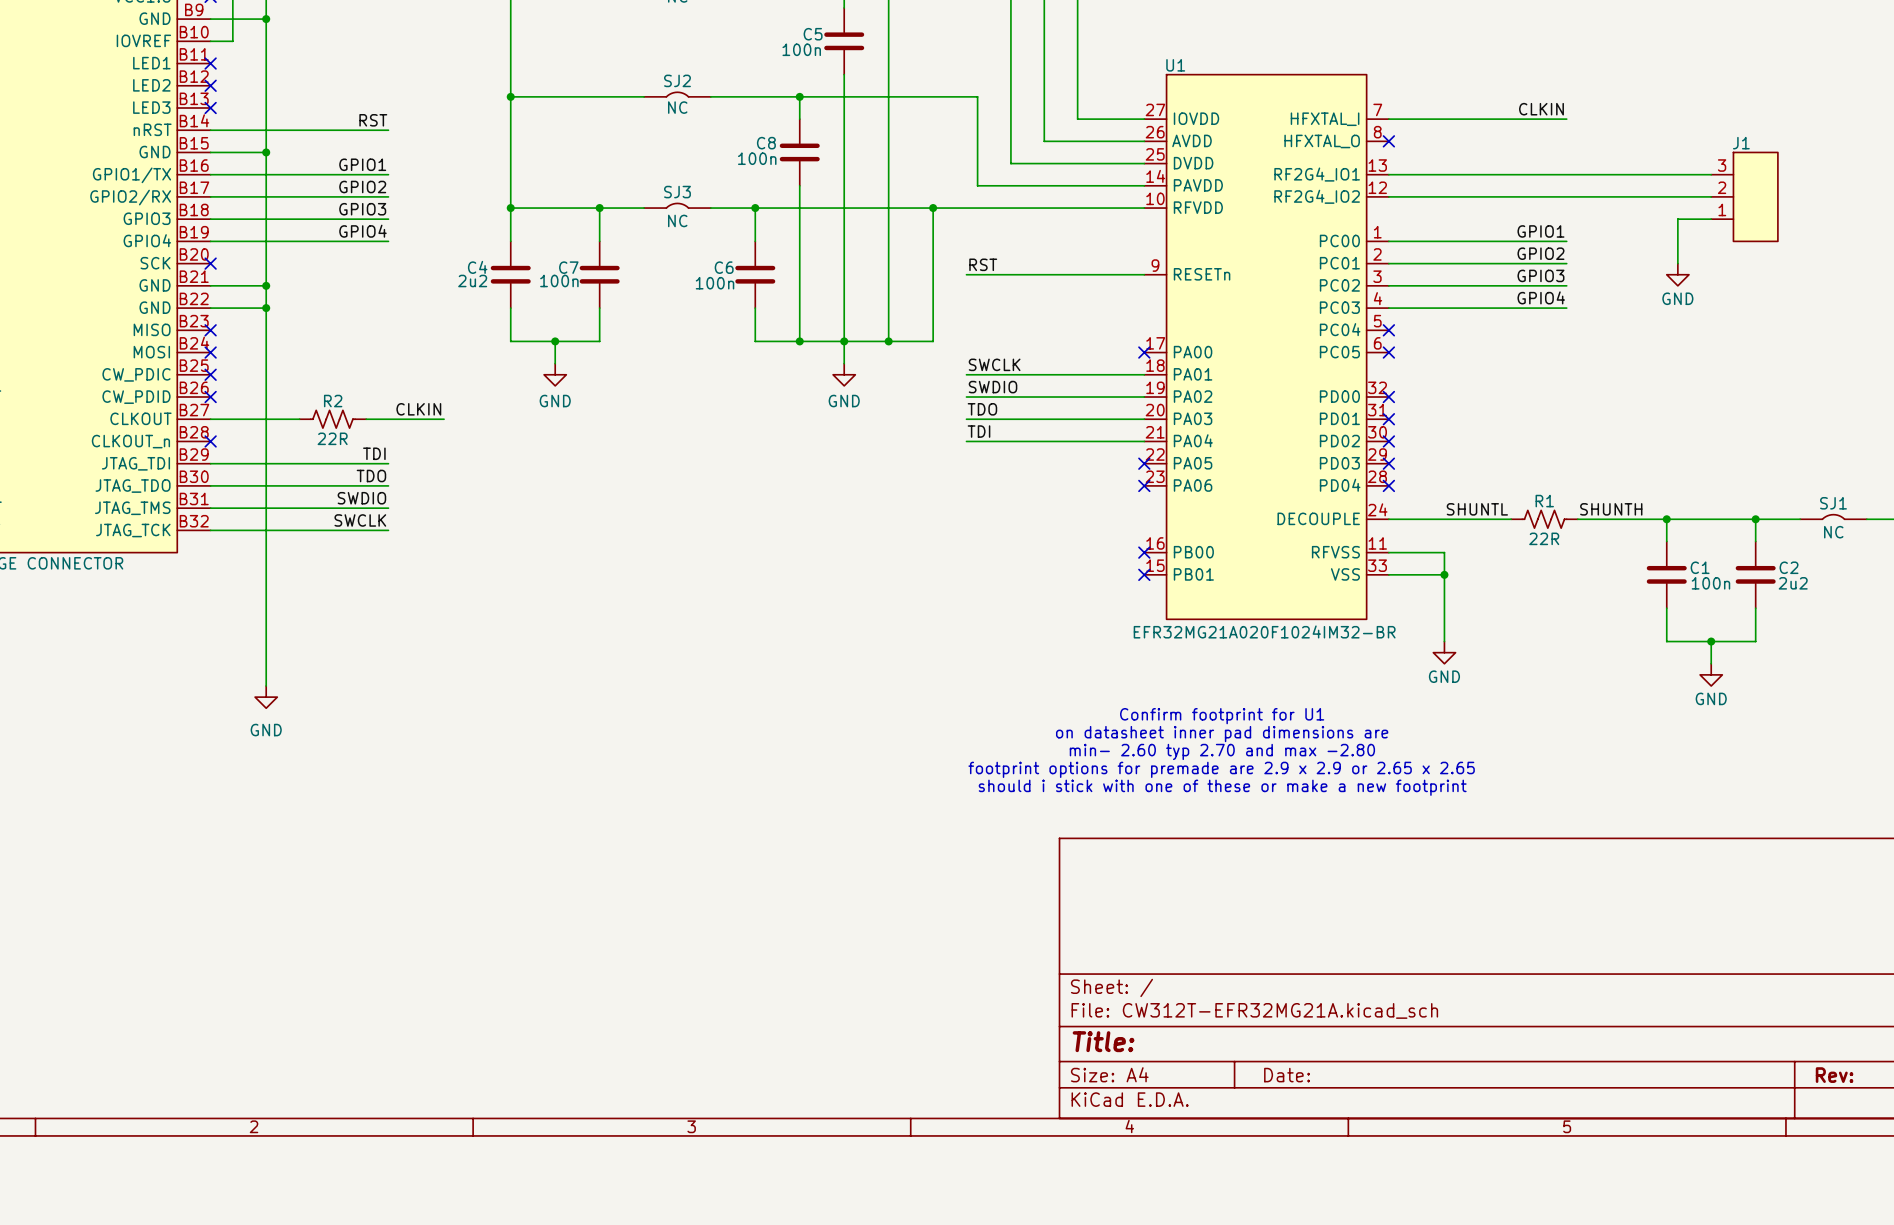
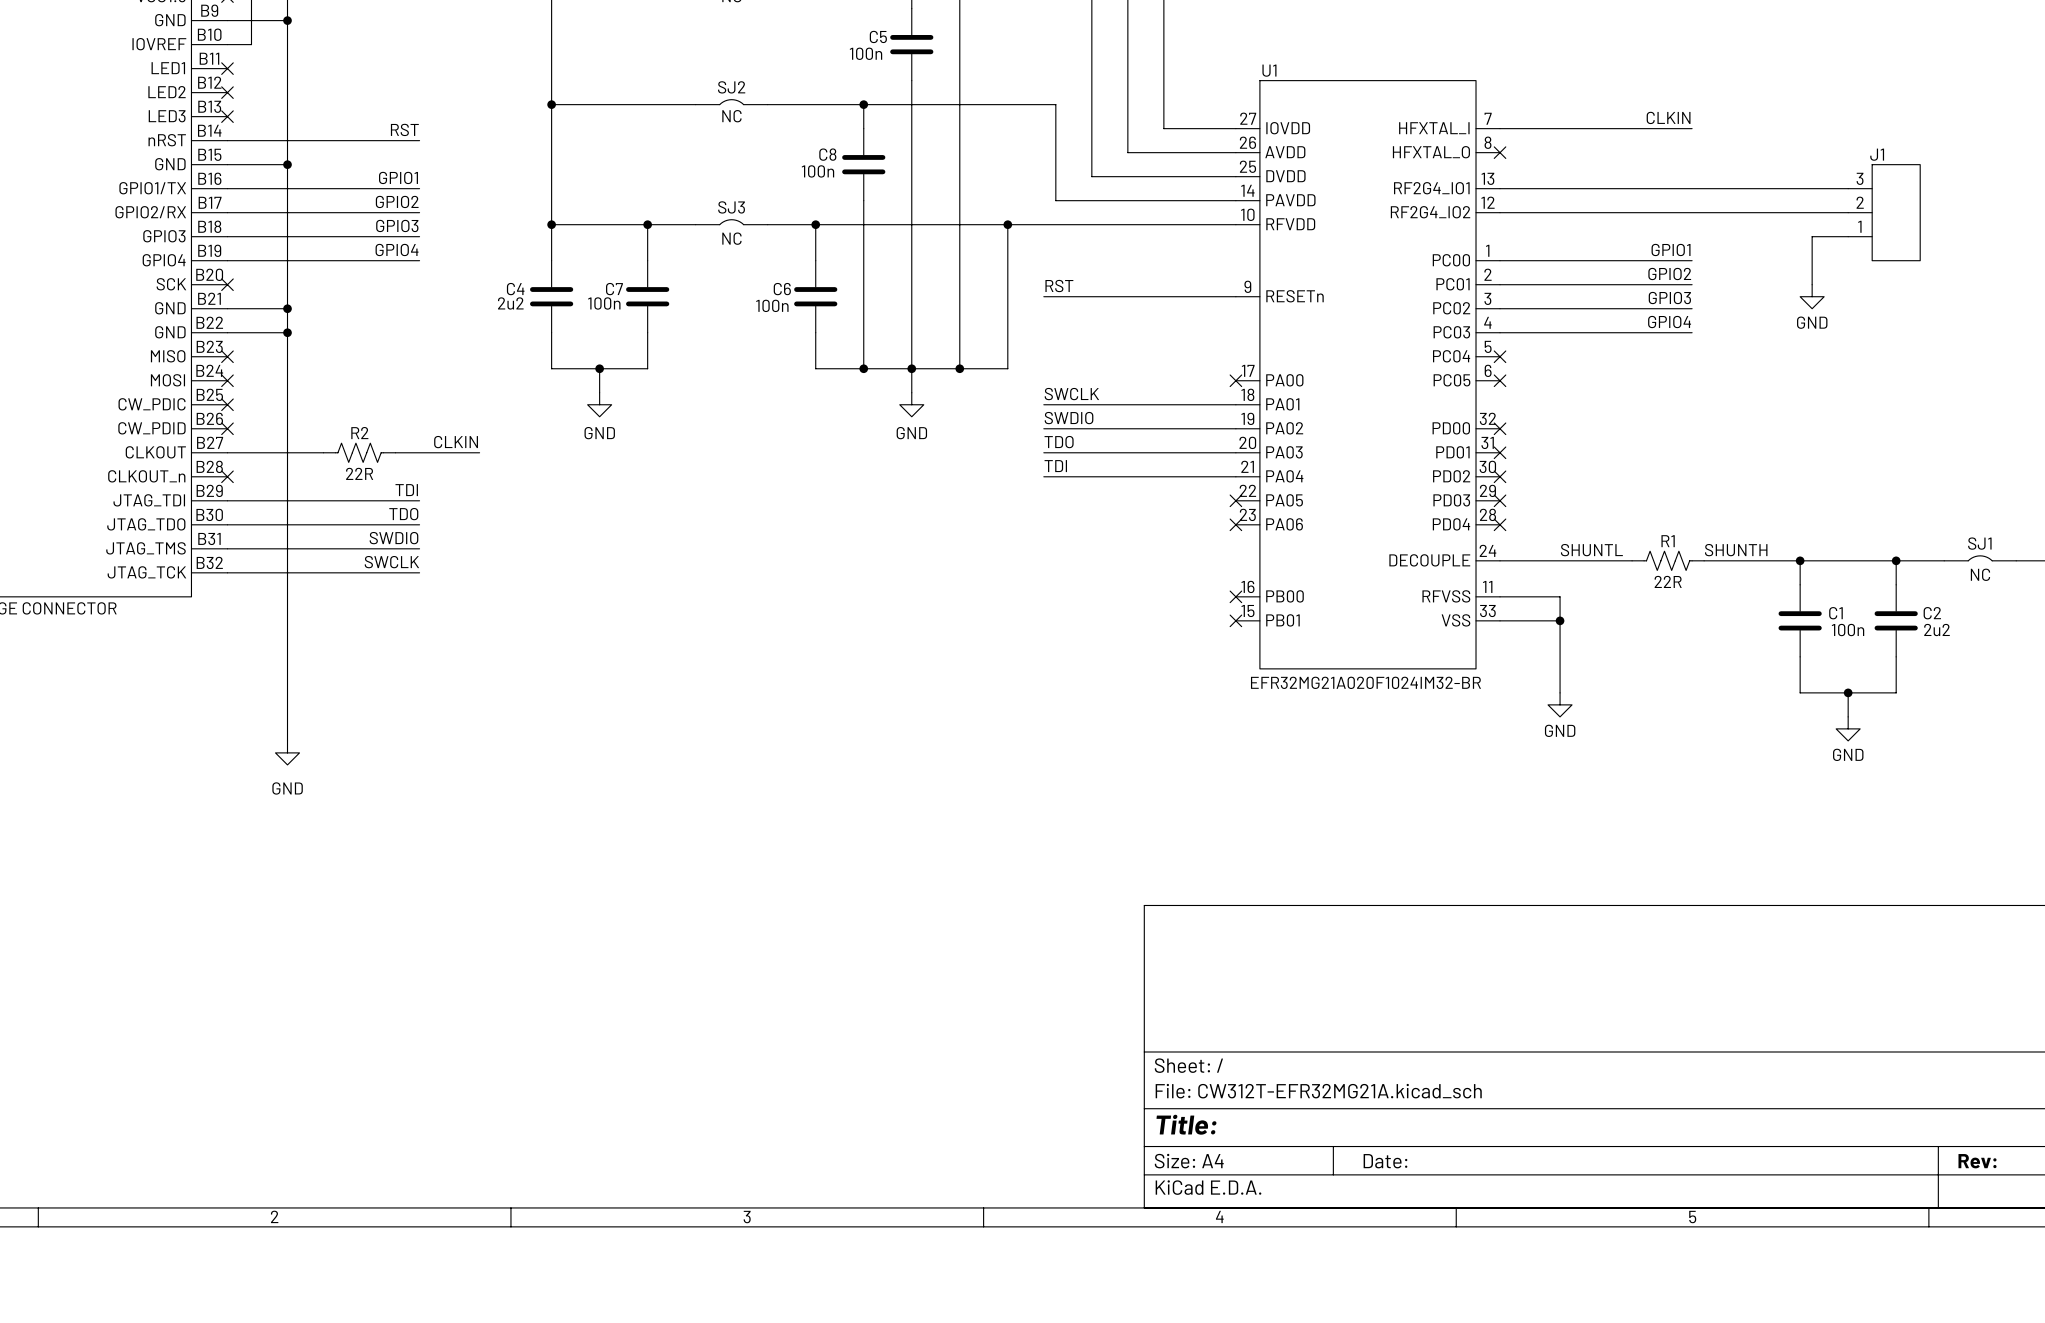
text: Confirm footprint for U1 (1222, 716) -> none
text: on datasheet inner pad dimensions are (1222, 734) -> none
text: min- 2.60 typ 2.70 and max -2.80 (1222, 751) -> none
text: footprint options for premade are 2.9 x 2.9 or 2.65 x 2.65 (1221, 769) -> none
text: should i stick with one of these or make a new footprint (1222, 787) -> none

